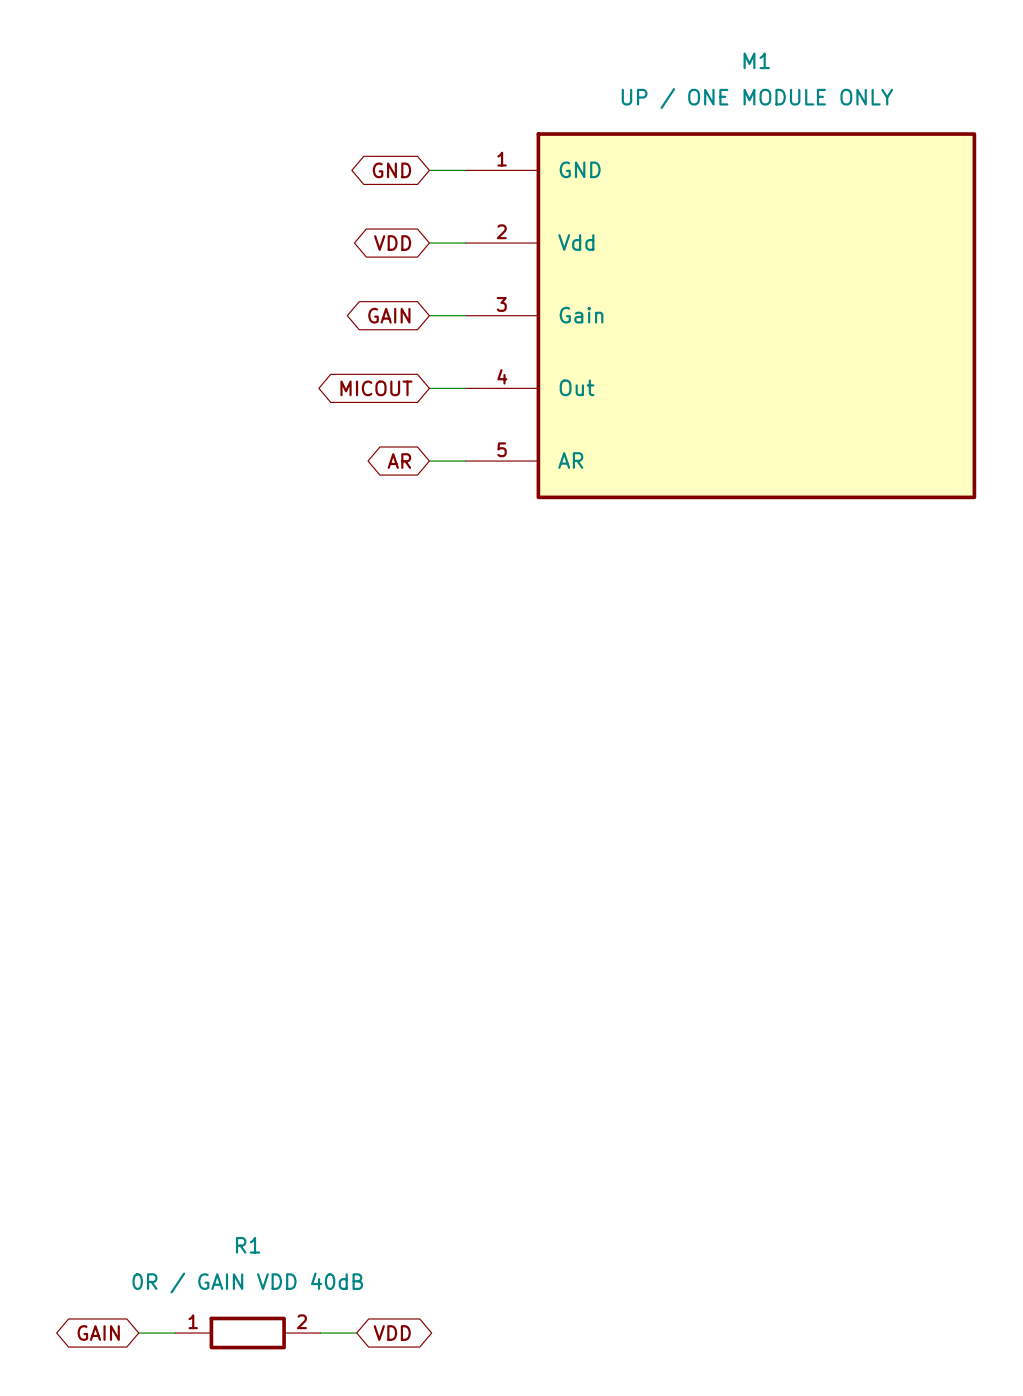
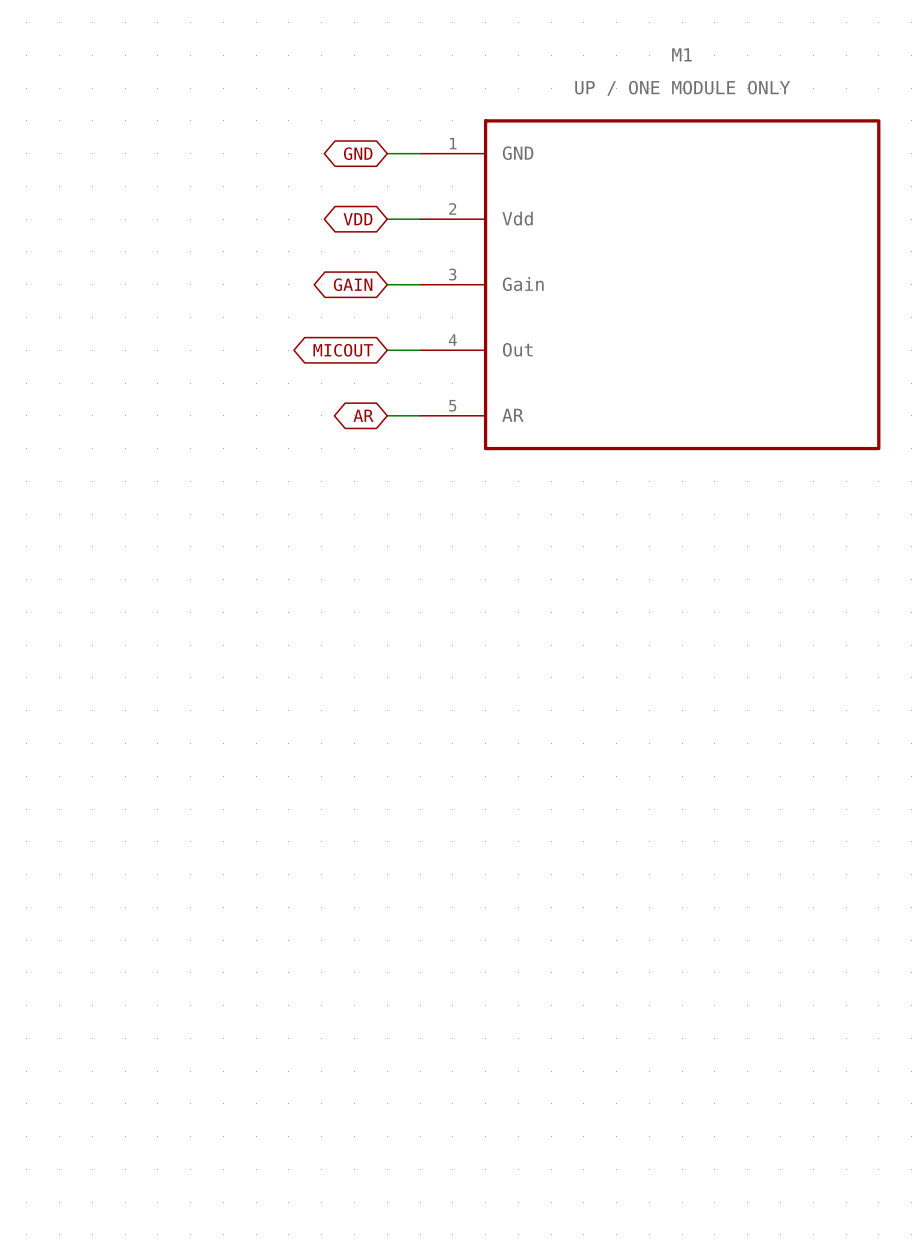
global label: GAIN (98, 1333) -> none
wire: (138, 1333) (175, 1333) -> none
R1: 0R / GAIN VDD 40dB (247, 1333) -> none
wire: (320, 1333) (356, 1333) -> none
global label: VDD (392, 1333) -> none

